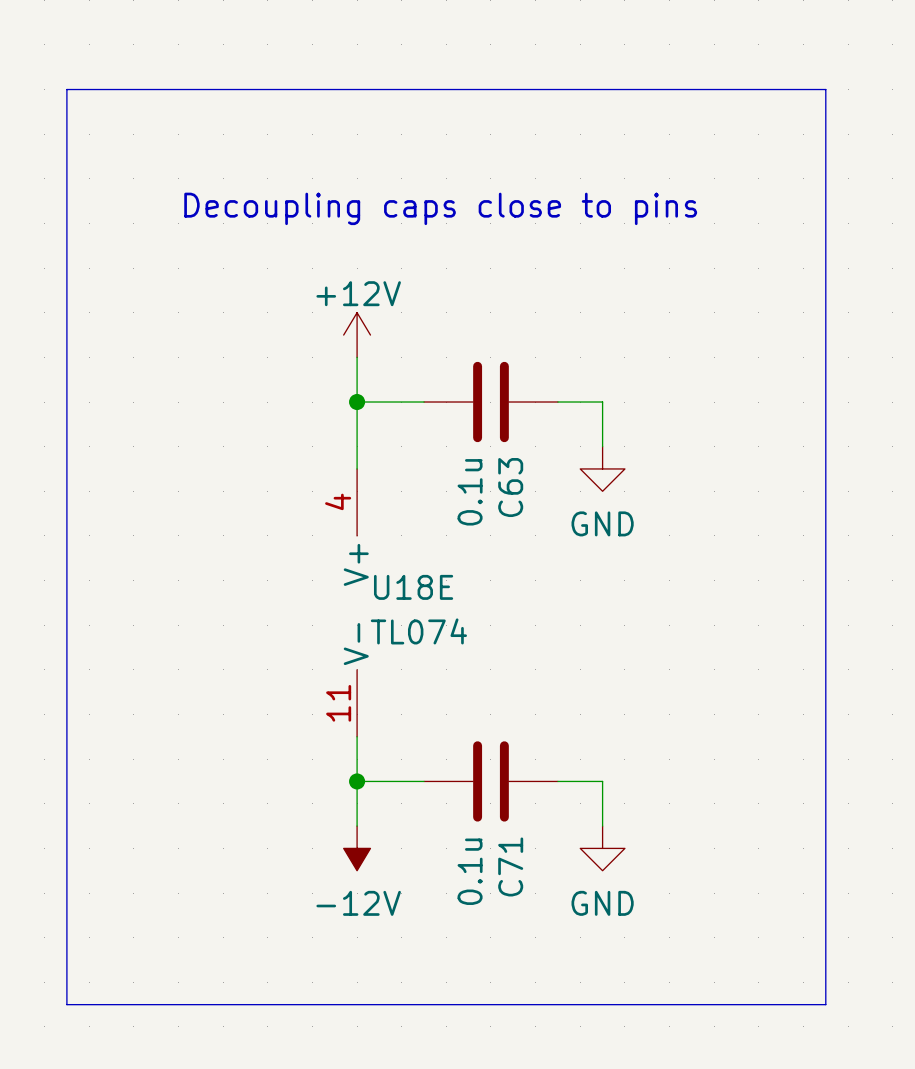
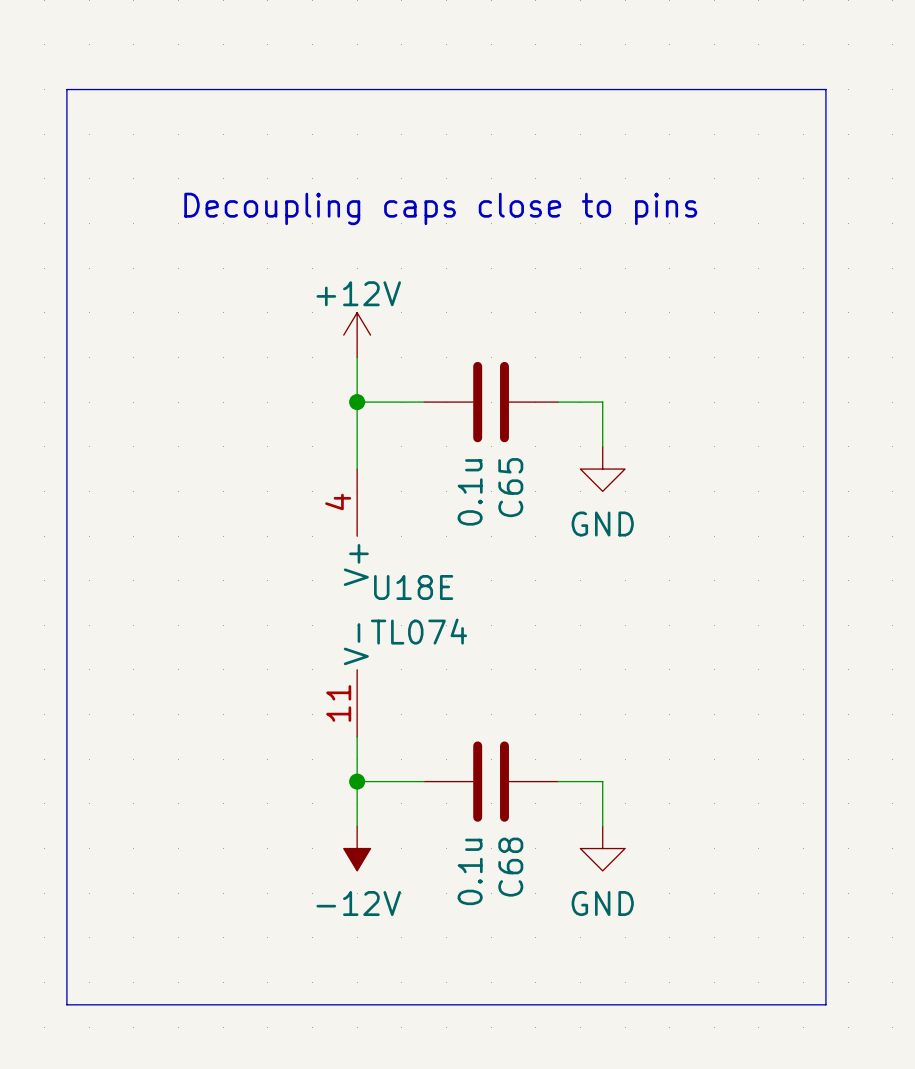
C63 name: C63 (510, 487) -> C65 (510, 487)
C71 name: C71 (510, 866) -> C68 (510, 867)

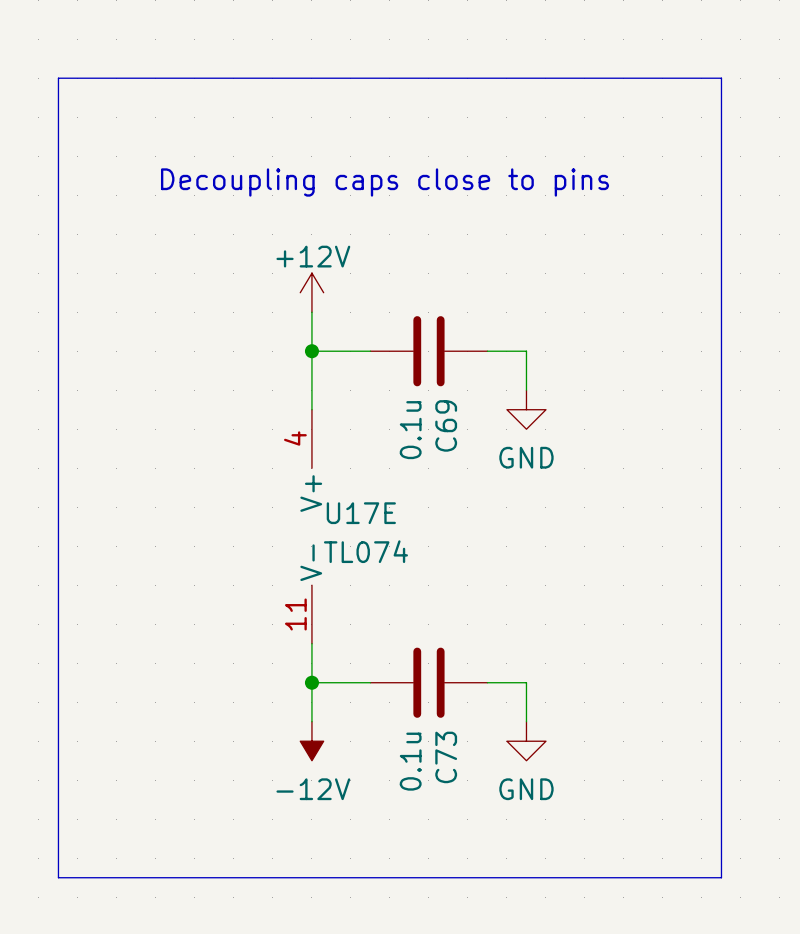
C65 name: C65 (510, 487) -> C69 (446, 425)
U18E name: U18E (413, 587) -> U17E (361, 513)
C68 name: C68 (510, 867) -> C73 (446, 757)

